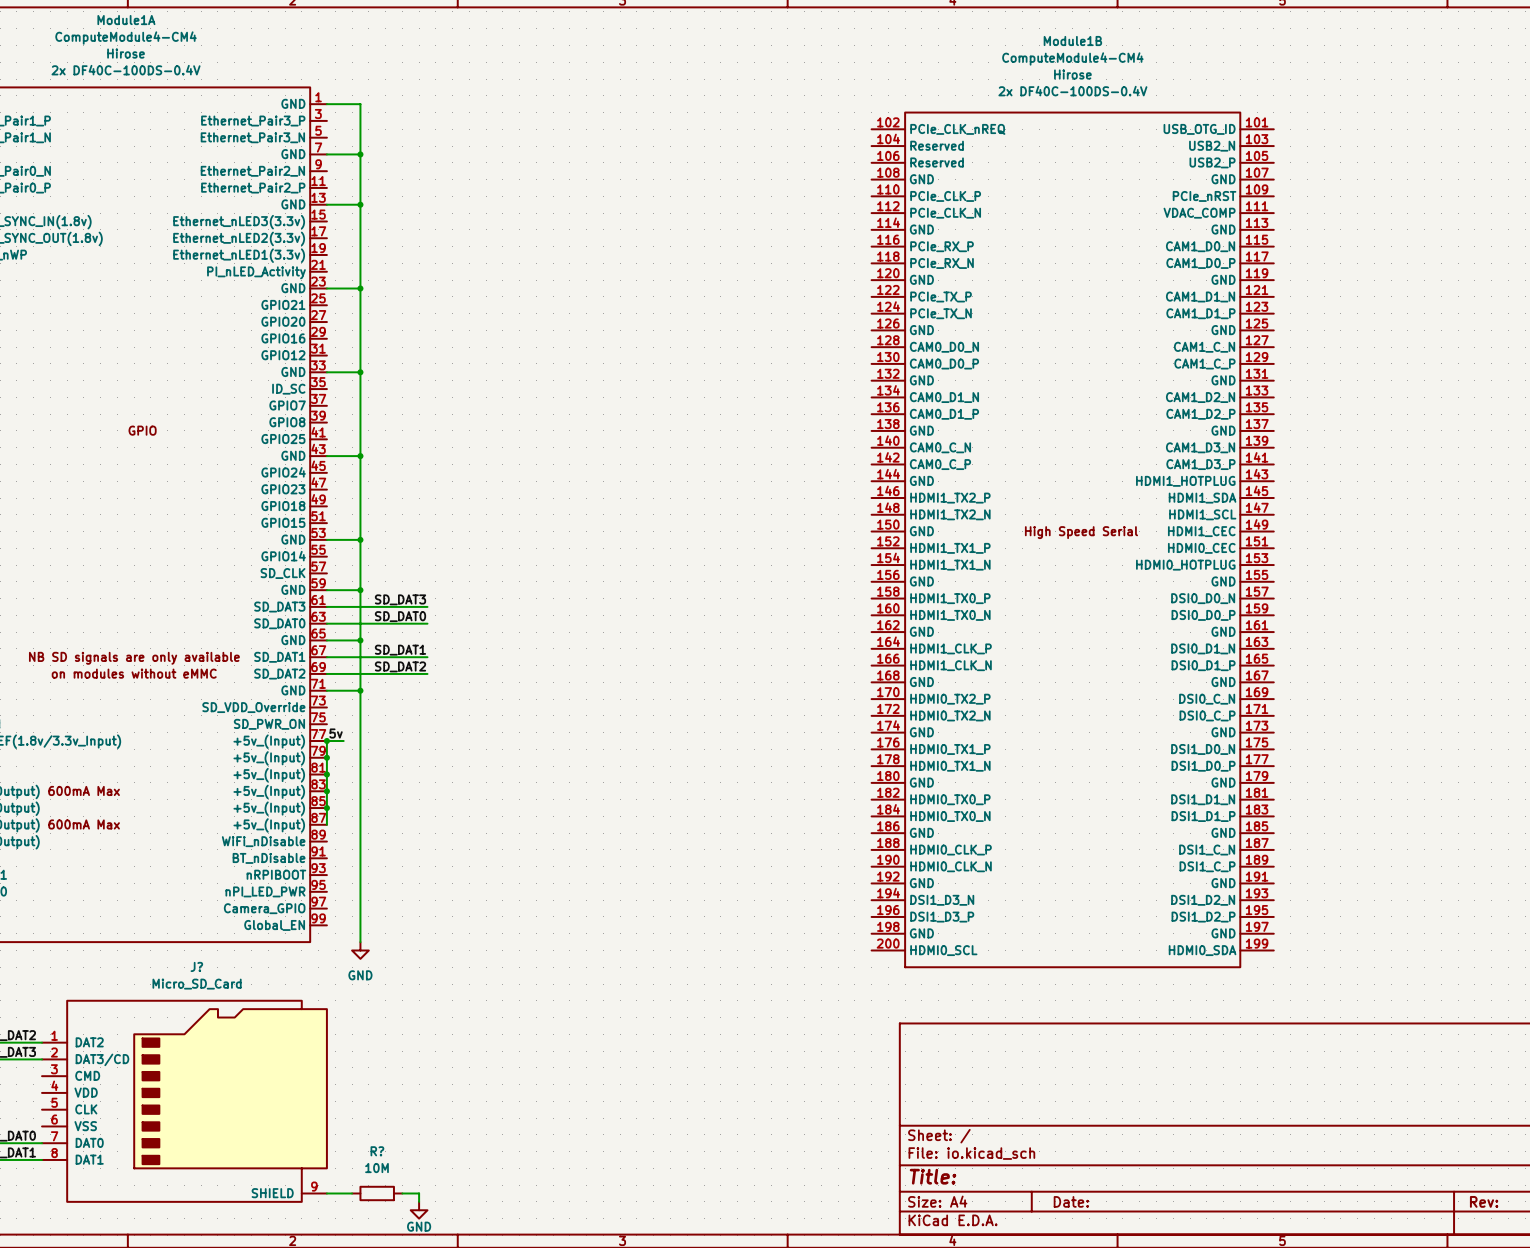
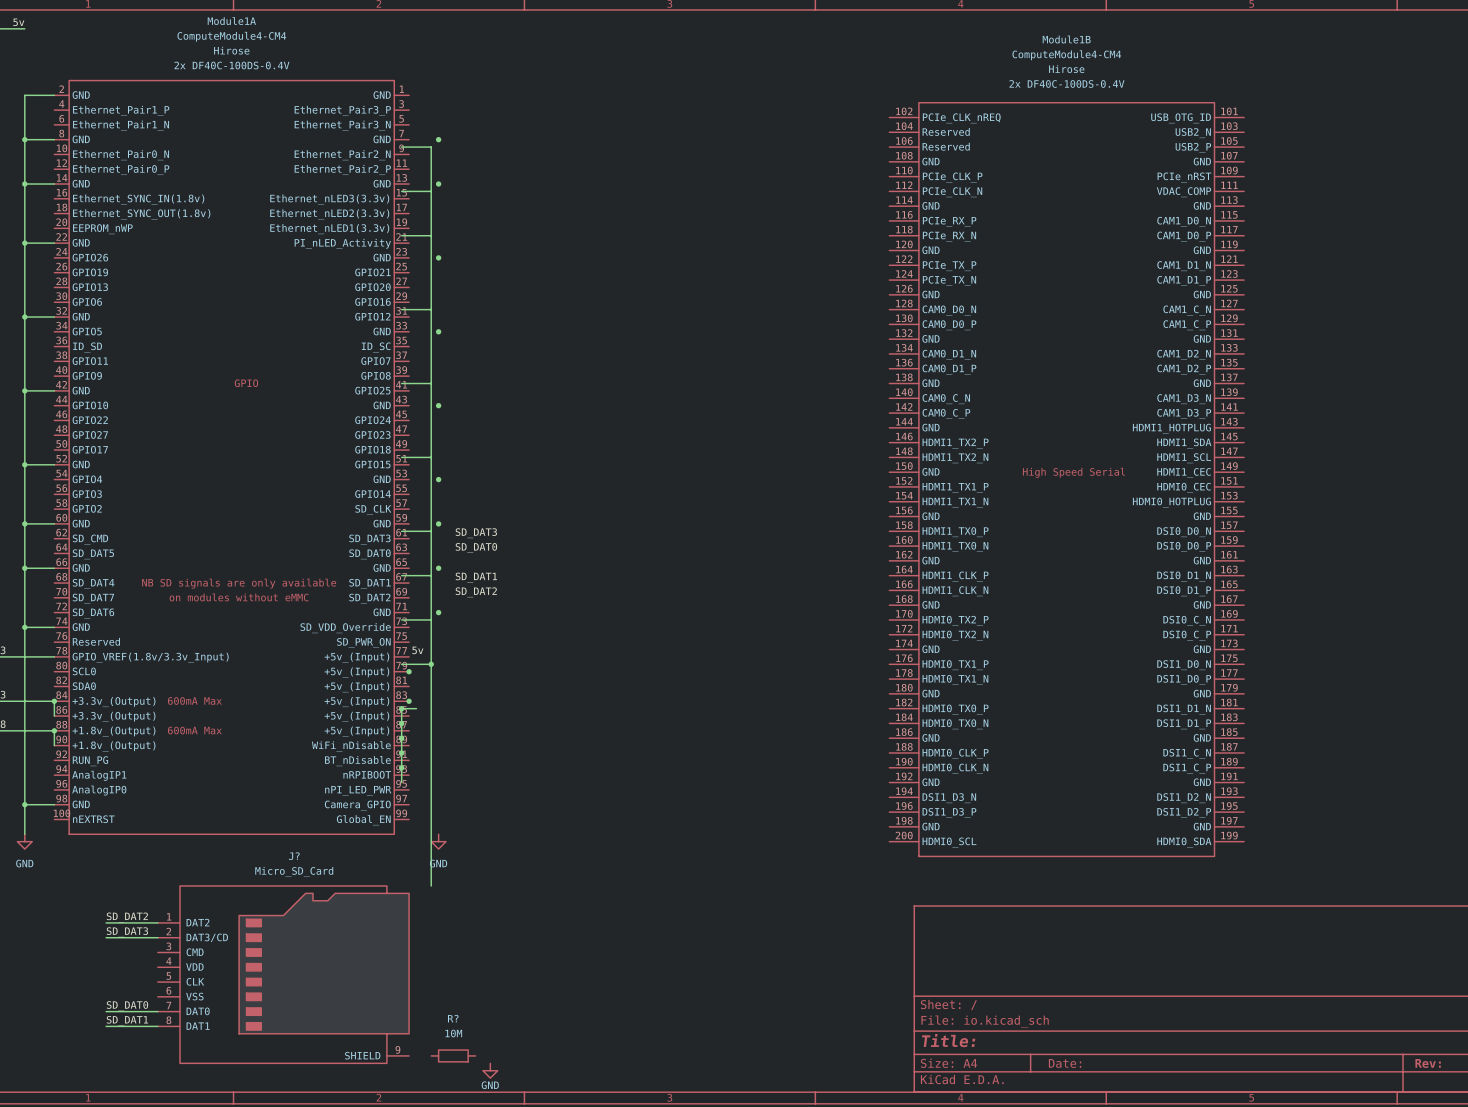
wire: (326, 104) (360, 104) (360, 942) -> (401, 147) (431, 147) (431, 885)
wire: (326, 154) (360, 154) -> (401, 191) (431, 191)
wire: (326, 204) (360, 204) -> (401, 235) (431, 235)
wire: (326, 288) (360, 288) -> (401, 309) (431, 309)
wire: (326, 372) (360, 372) -> (401, 383) (431, 383)
wire: (326, 456) (360, 456) -> (401, 457) (431, 457)
wire: (326, 539) (360, 539) -> (401, 531) (431, 531)
wire: (326, 590) (360, 590) -> (401, 575) (431, 575)
wire: (326, 606) (427, 606) -> none
wire: (326, 623) (427, 623) -> none
wire: (326, 640) (360, 640) -> (401, 619) (431, 619)
wire: (326, 657) (427, 657) -> none
wire: (326, 673) (427, 673) -> none
wire: (326, 690) (360, 690) -> (401, 664) (431, 664)
junction: (326, 741) -> none
wire: (343, 741) (326, 741) (326, 824) -> (416, 708) (401, 708) (401, 782)
junction: none -> (431, 664)
junction: (326, 774) -> none
junction: none -> (401, 708)
junction: (326, 808) -> none
junction: none -> (401, 723)
junction: none -> (401, 738)
junction: none -> (401, 752)
junction: none -> (401, 767)
wire: (326, 1193) (352, 1193) -> none
wire: (402, 1193) (419, 1193) (419, 1201) -> none

